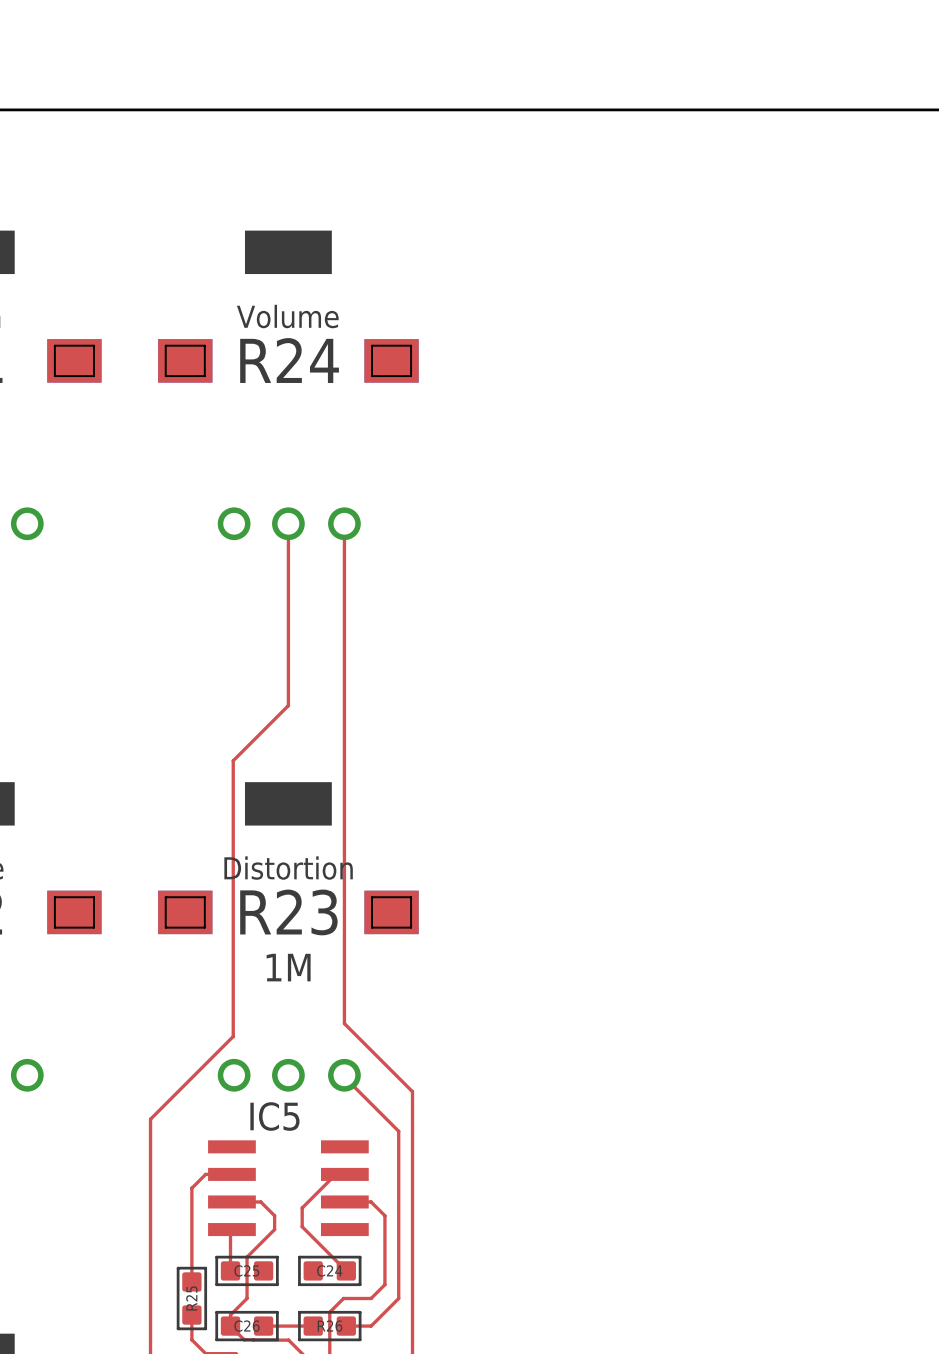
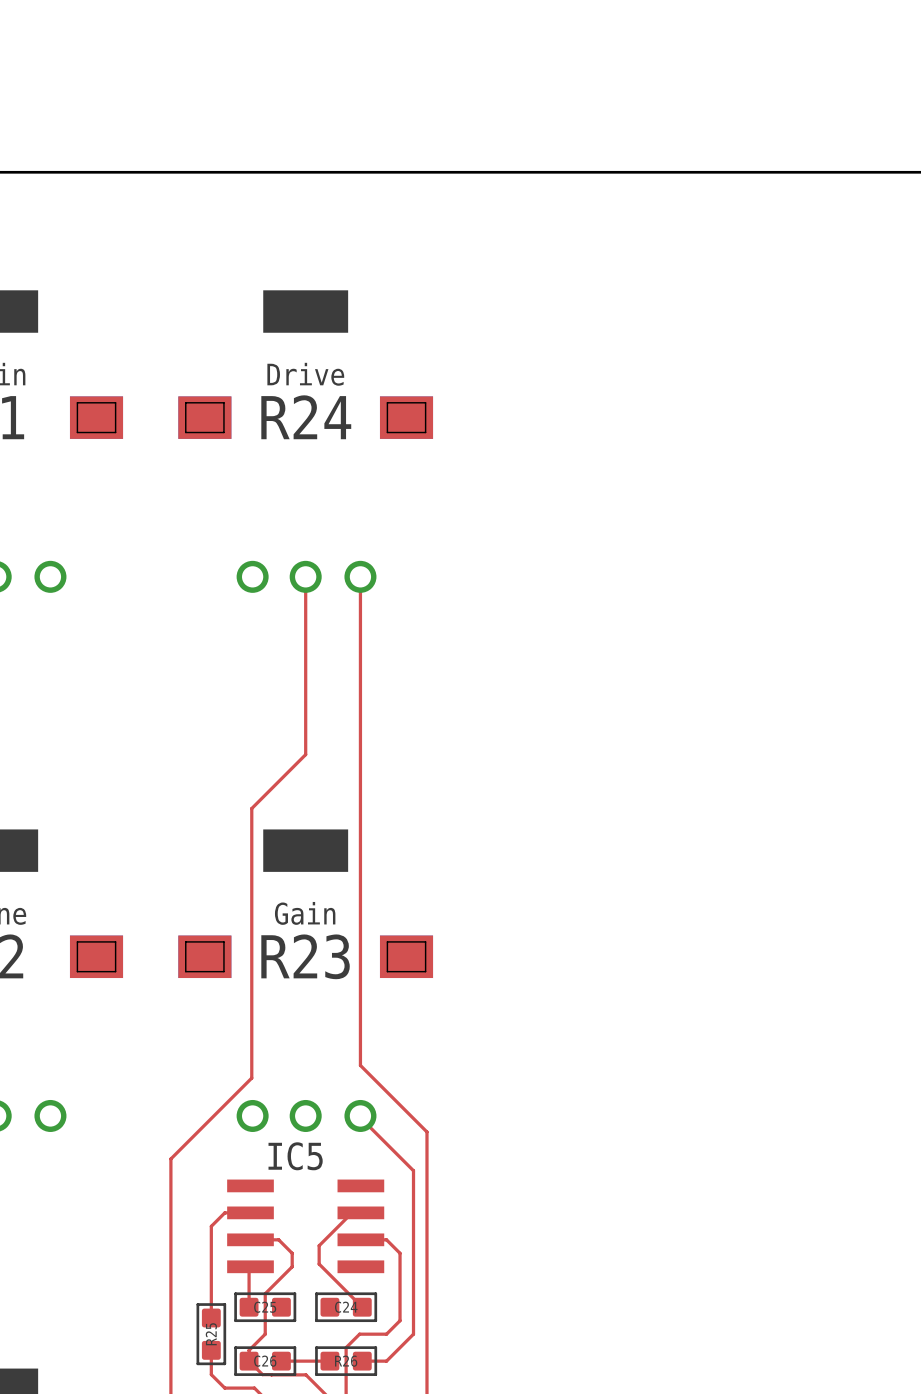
R24 text: Volume (287, 316) -> Drive (305, 374)
R23 text: Distortion (288, 868) -> Gain (305, 913)
R23 value: 1M (288, 967) -> none

